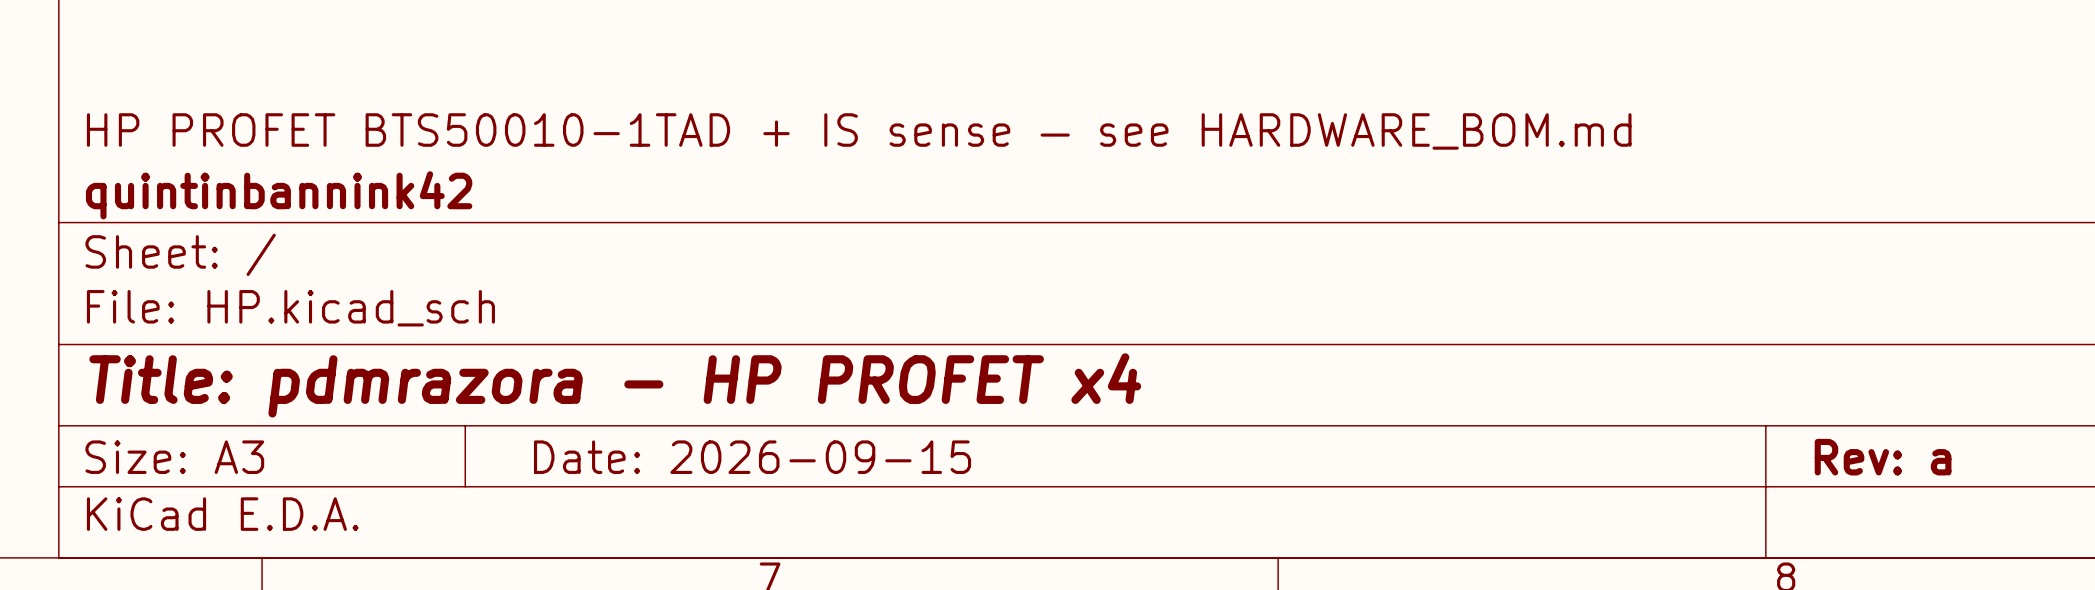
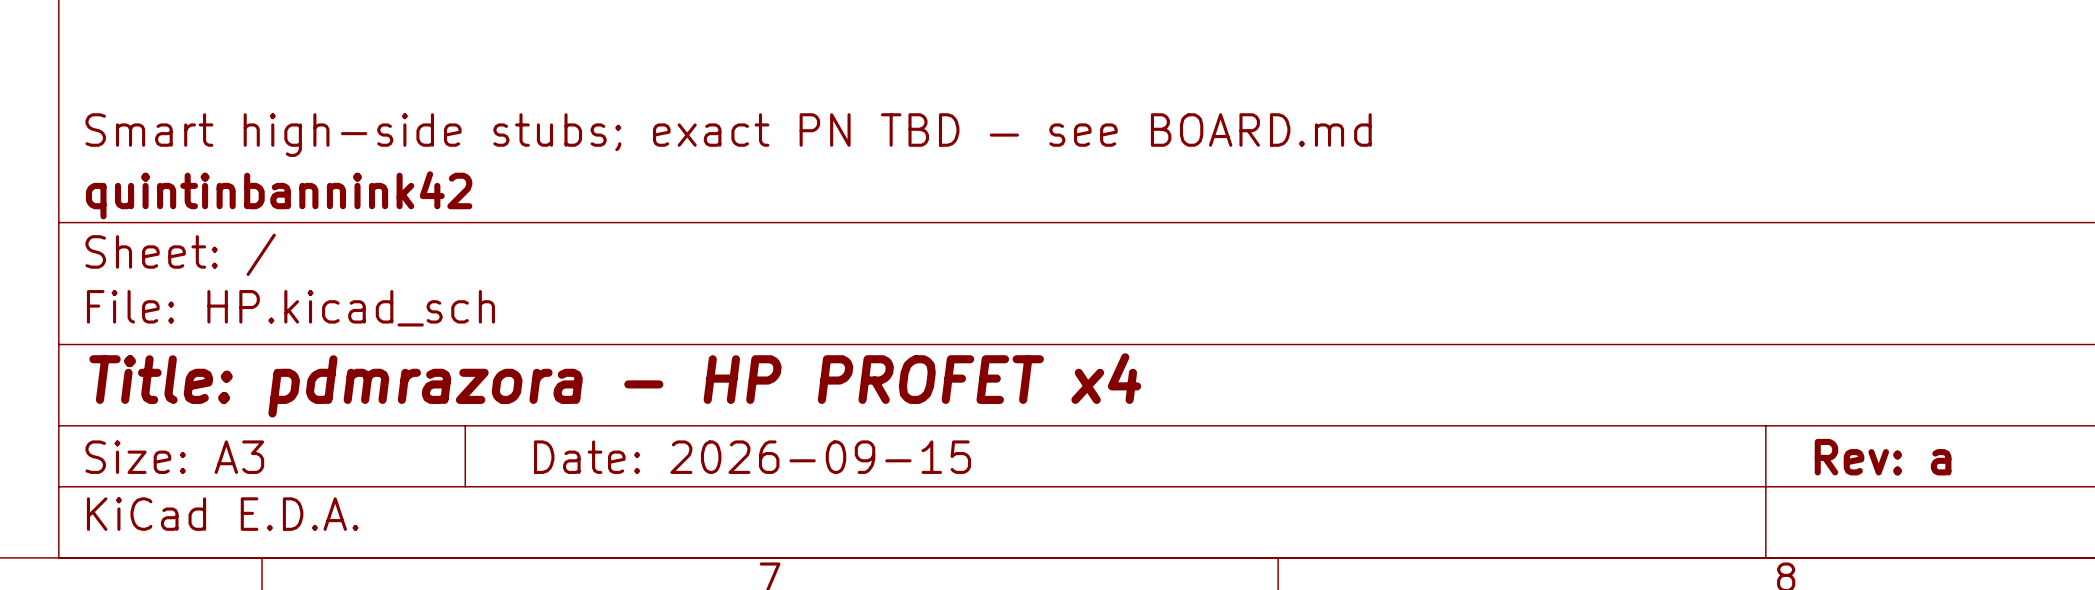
title block: HP PROFET BTS50010-1TAD + IS sense — see HARDWARE_BOM.md (859, 131) -> Smart high-side stubs; exact PN TBD — see BOARD.md (728, 135)

